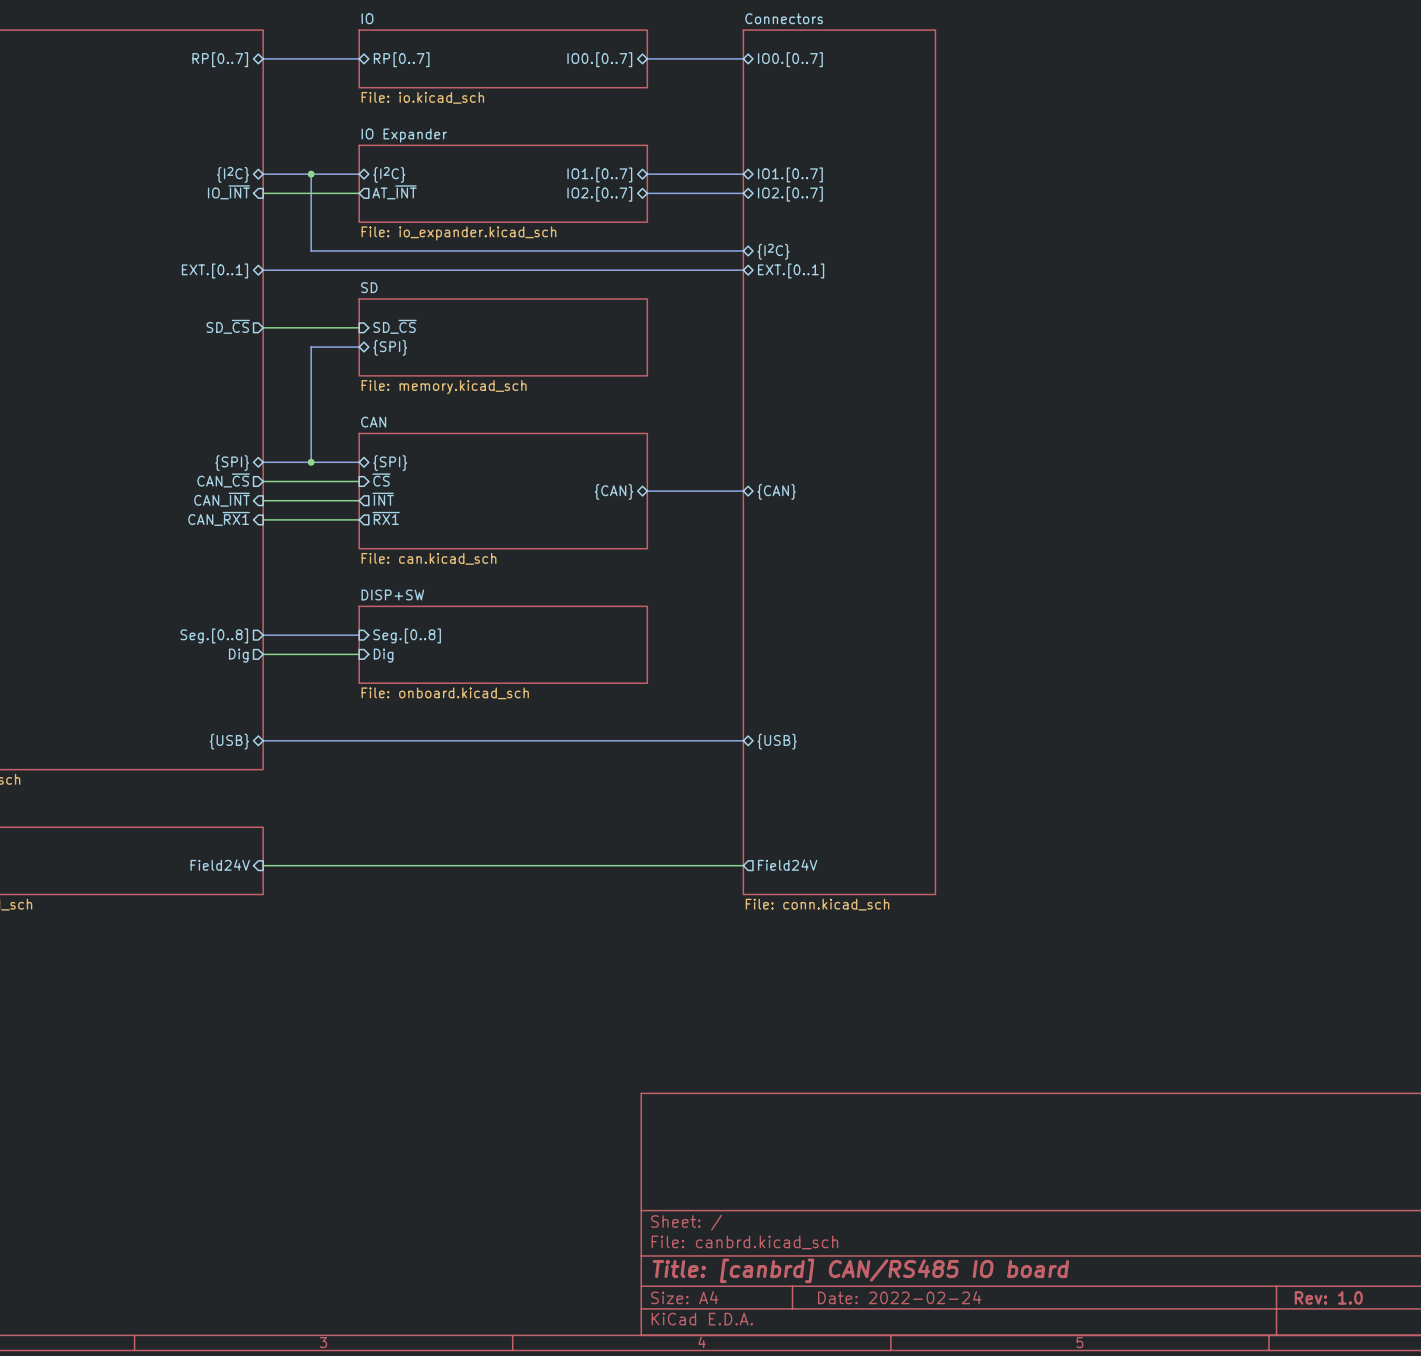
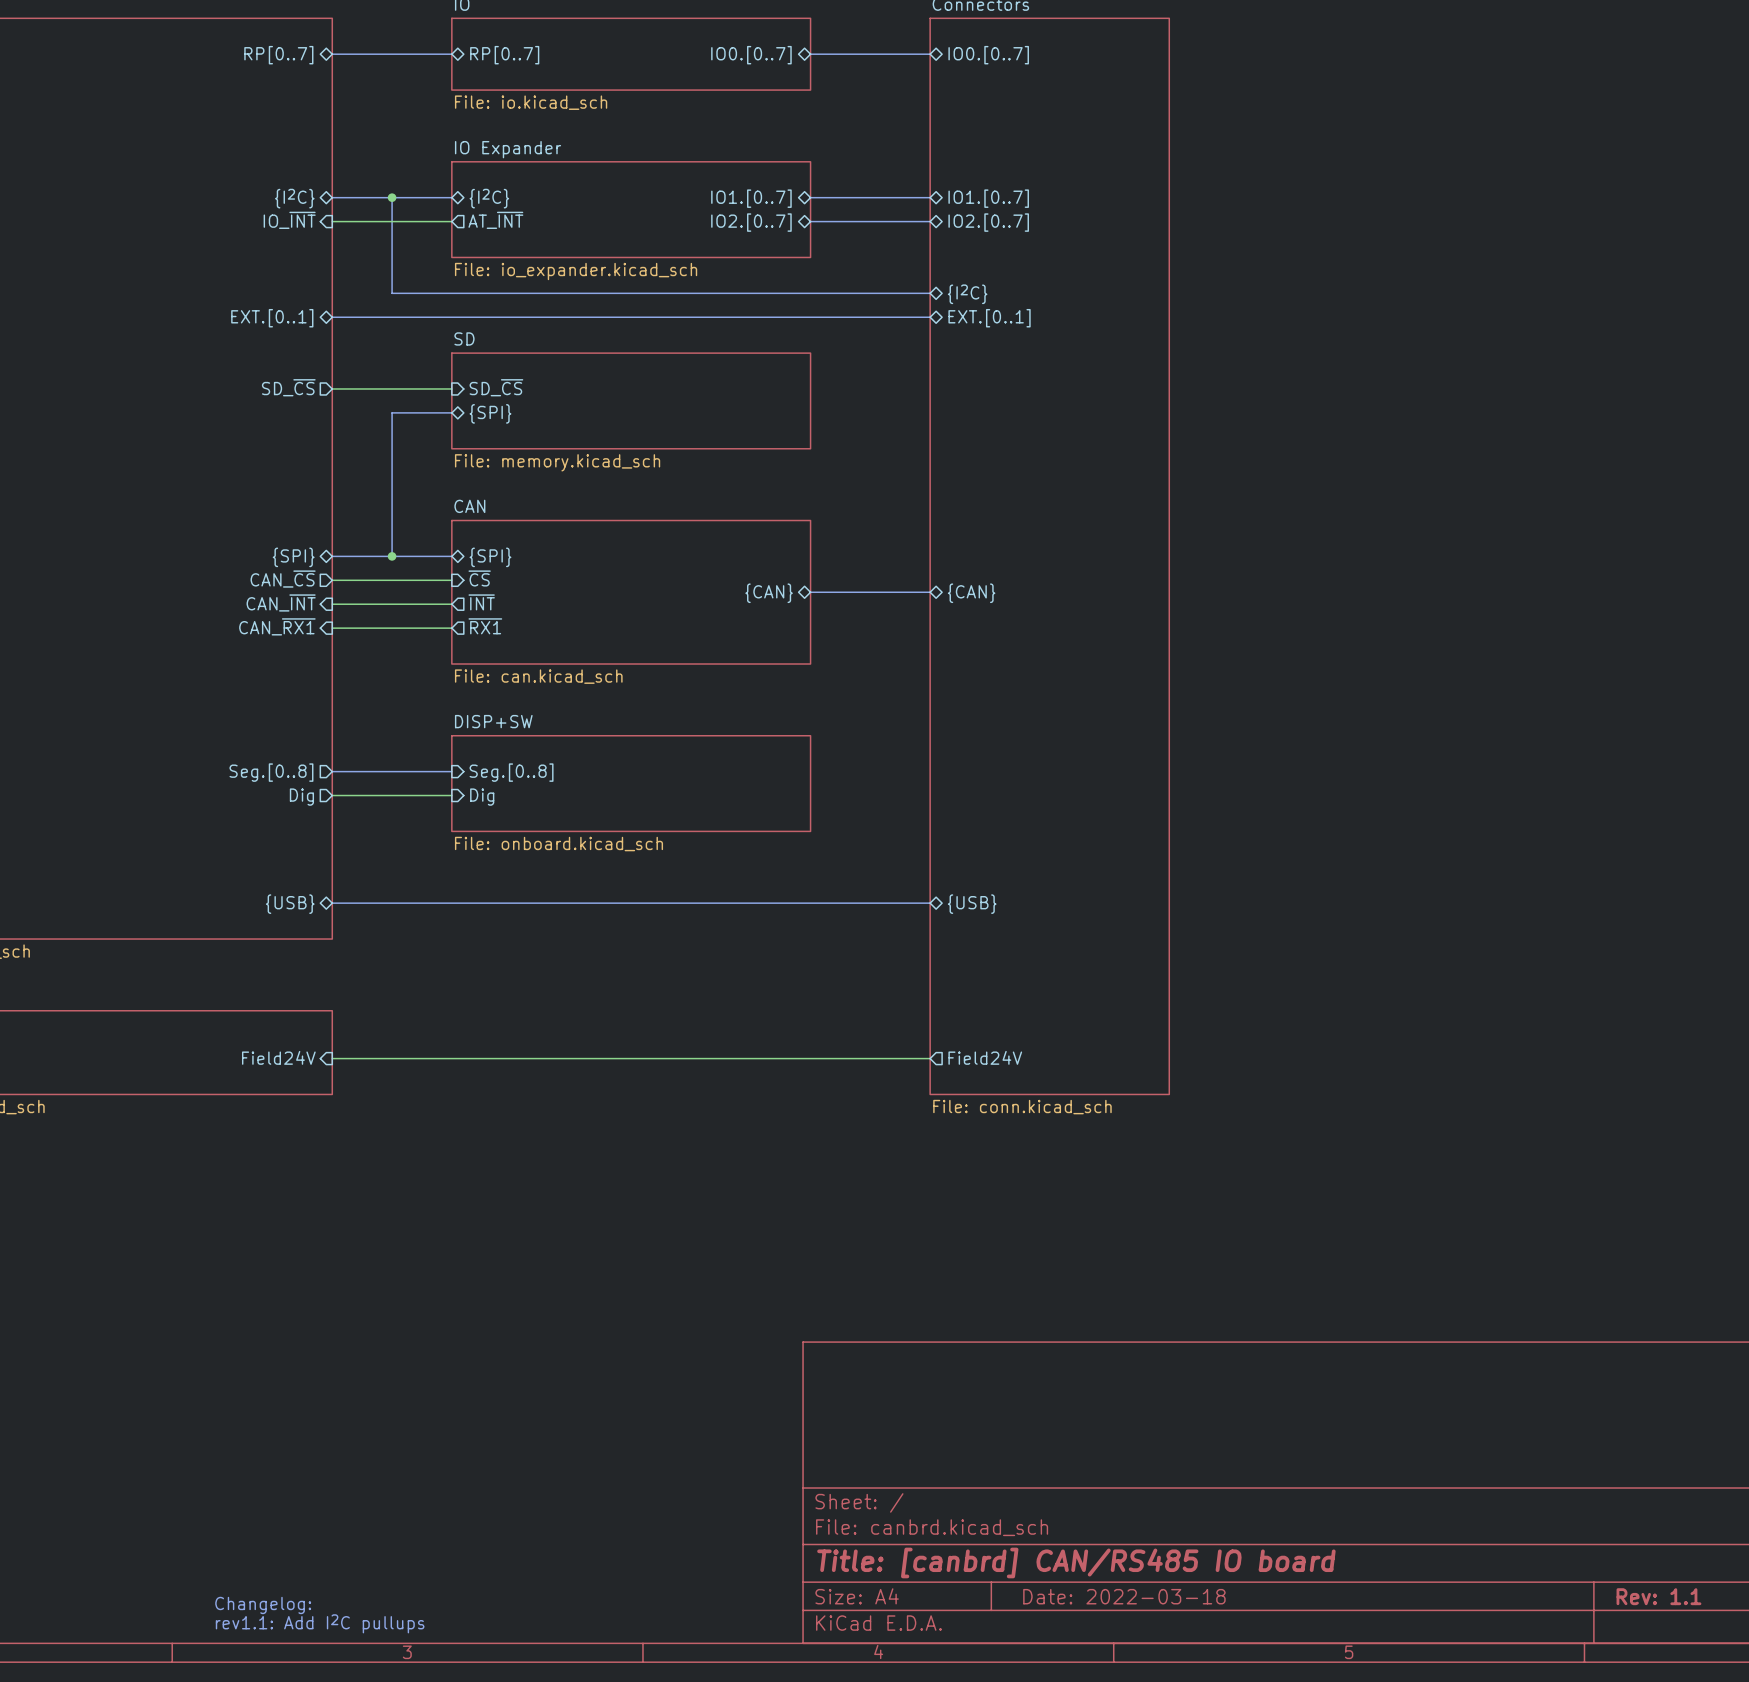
title block: Date: 2022-02-24 (899, 1297) -> Date: 2022-03-18 (1124, 1596)
title block: Rev: 1.0 (1328, 1297) -> Rev: 1.1 (1658, 1596)
text: none -> Changelog: (263, 1605)
text: none -> rev1.1: Add I2C pullups (320, 1623)

